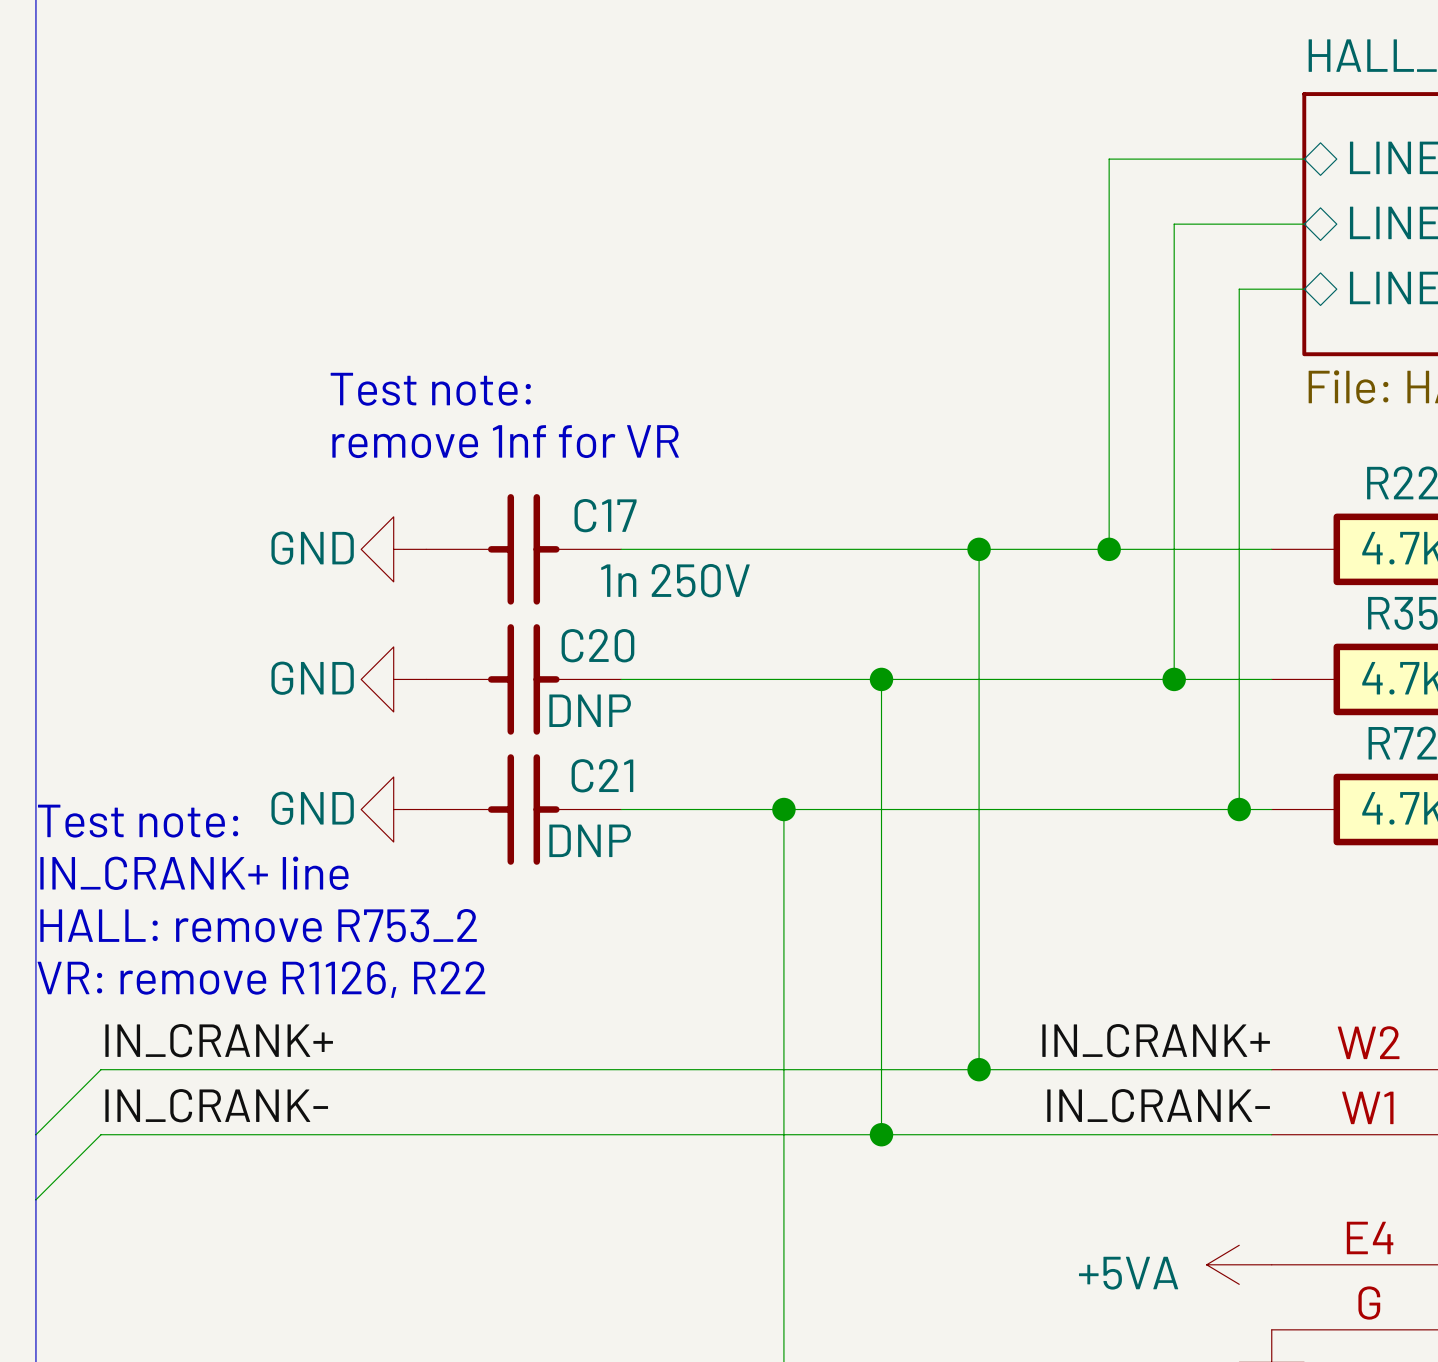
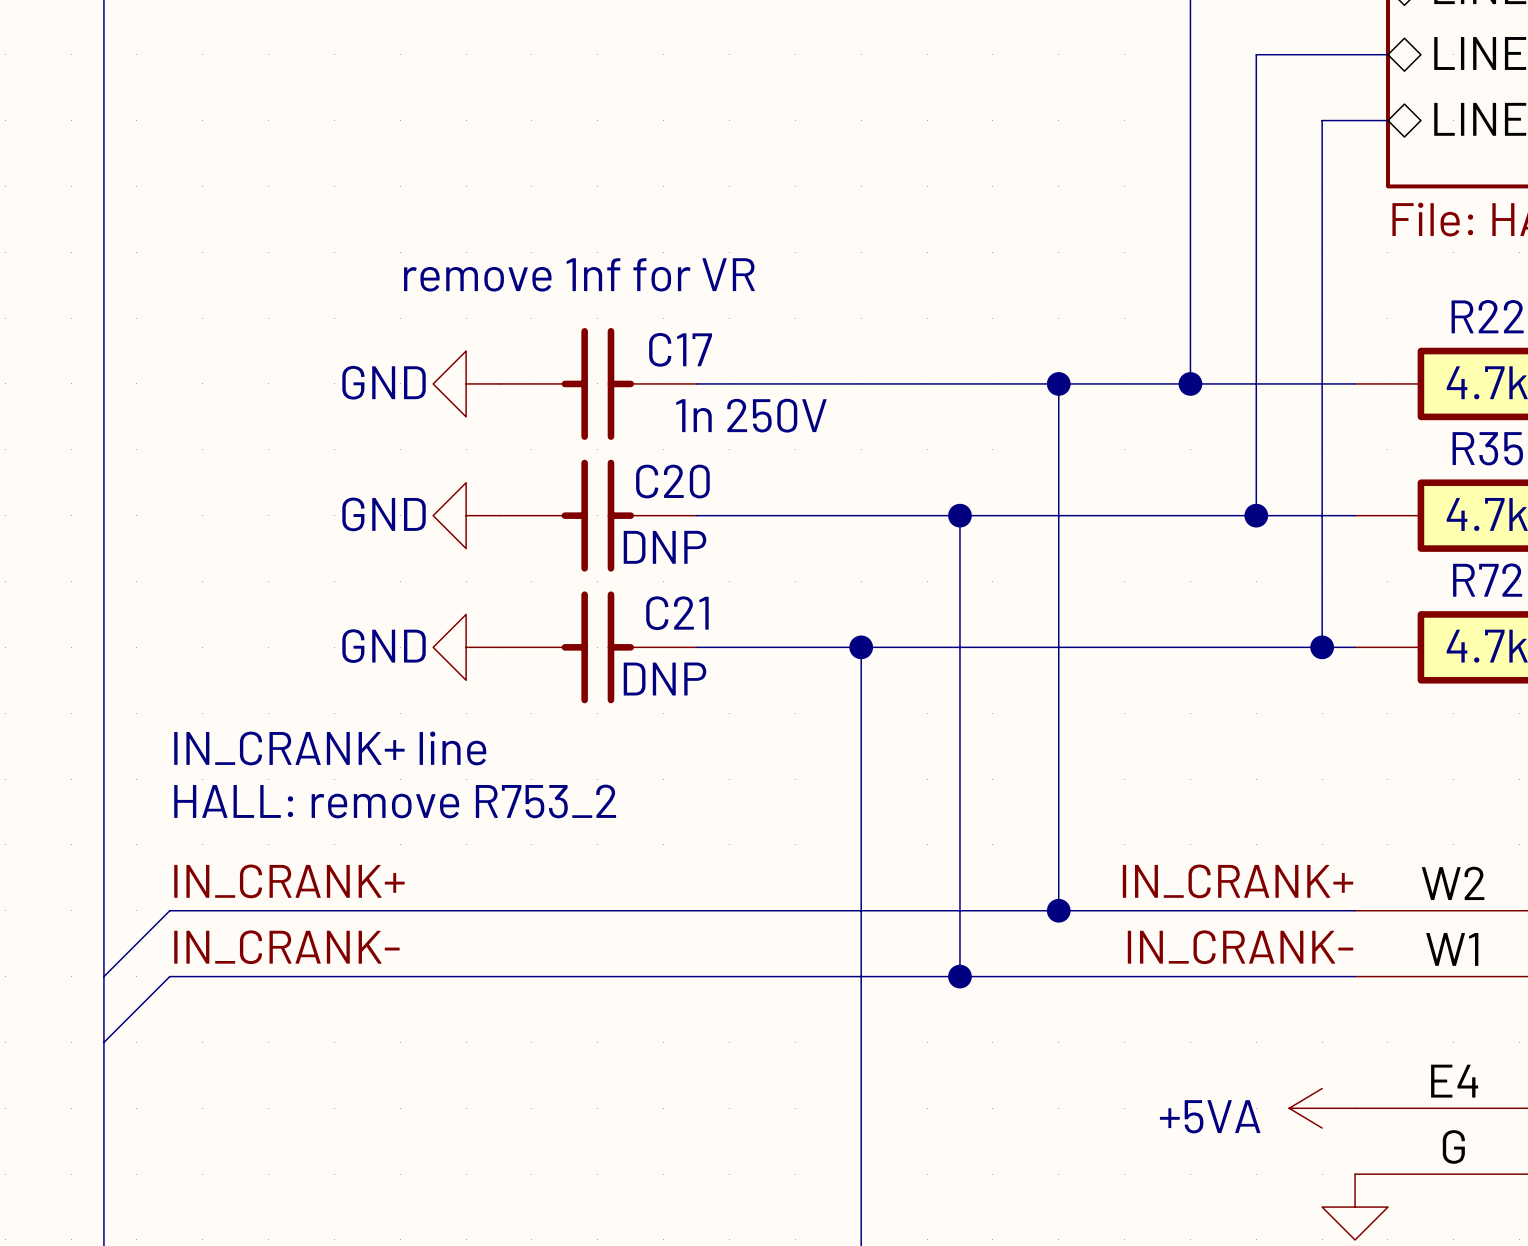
text: Test note: (430, 389) -> none
text: Test note: (138, 821) -> none
text position: IN_CRANK+ line (194, 873) -> IN_CRANK+ line (330, 748)
text position: HALL: remove R753_2 (258, 925) -> HALL: remove R753_2 (395, 801)
text: VR: remove R1126, R22 (261, 979) -> none

